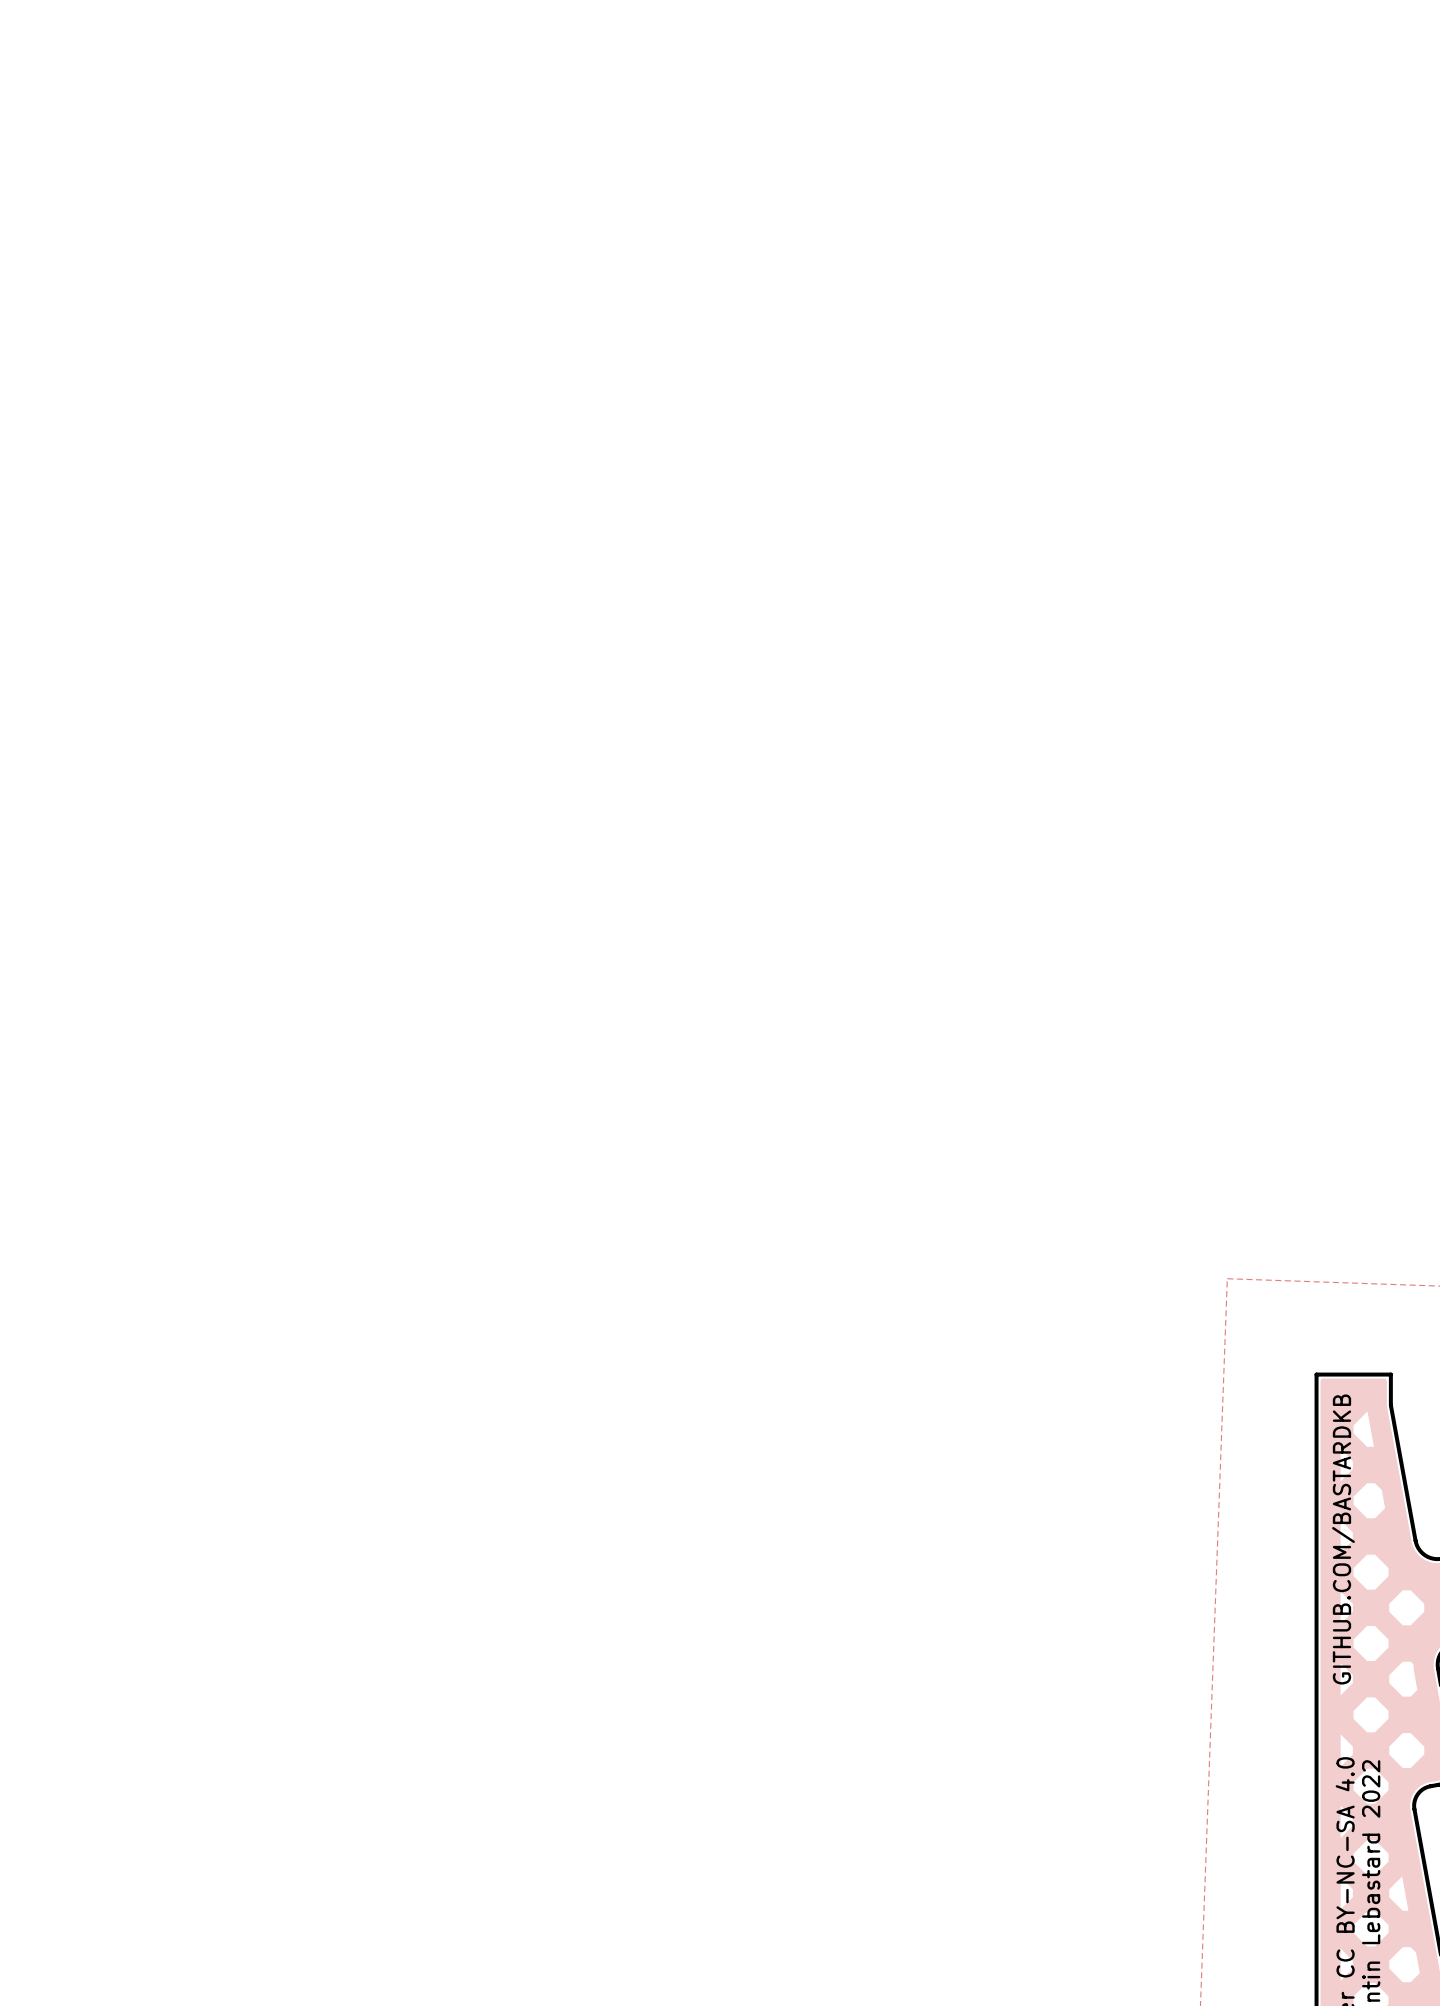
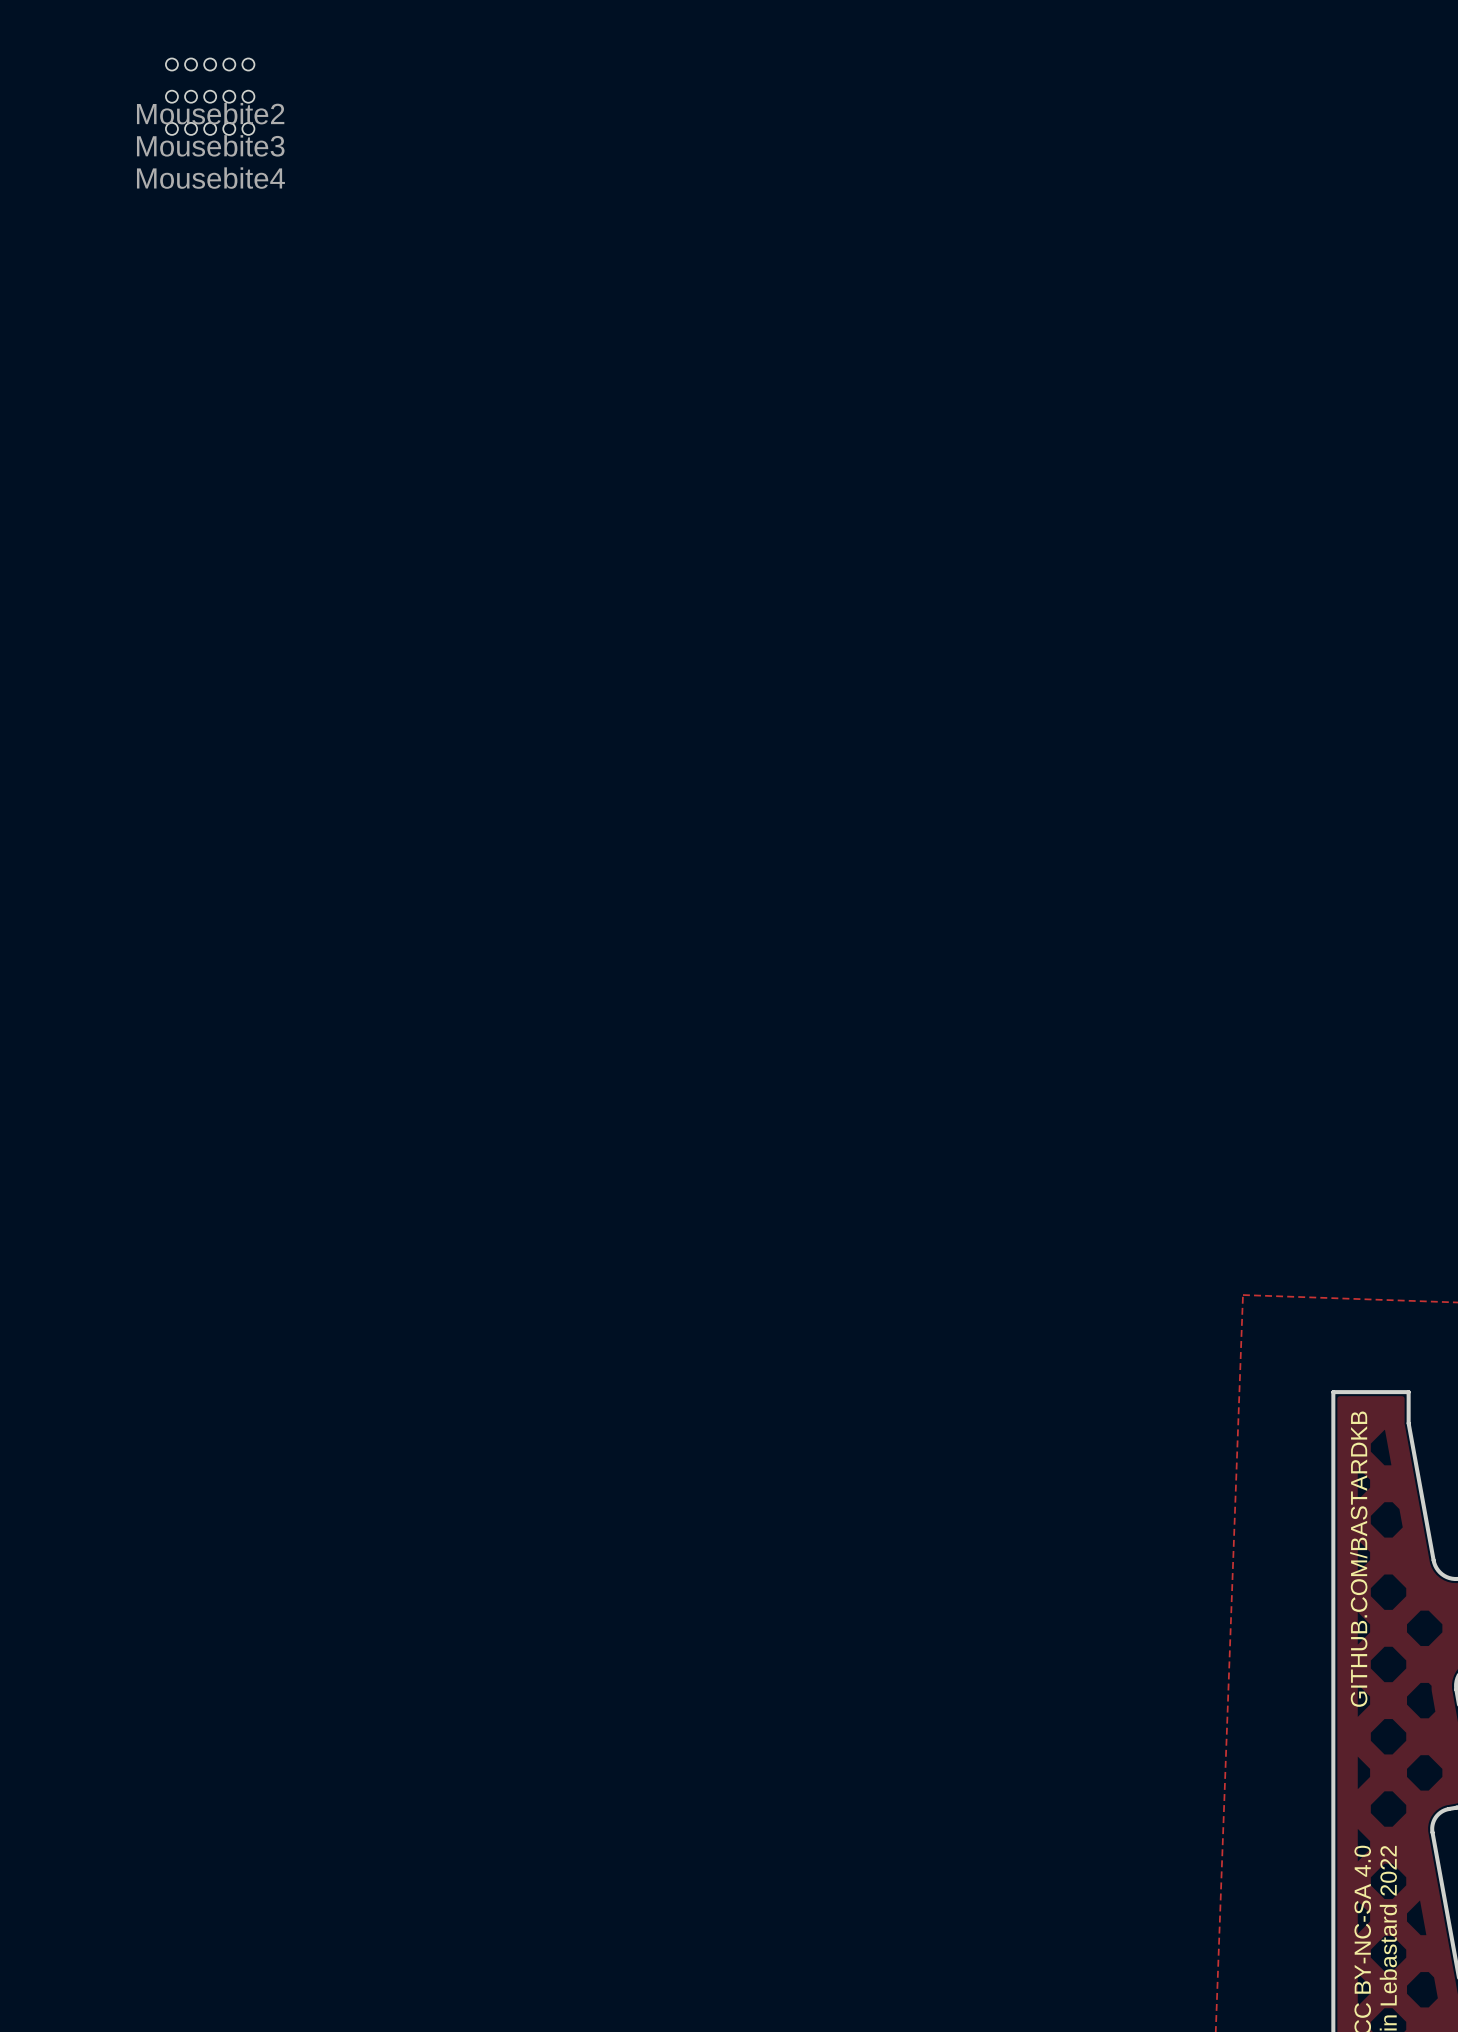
Mousebite2: none -> (210, 64)
Mousebite3: none -> (210, 96)
Mousebite4: none -> (210, 128)

